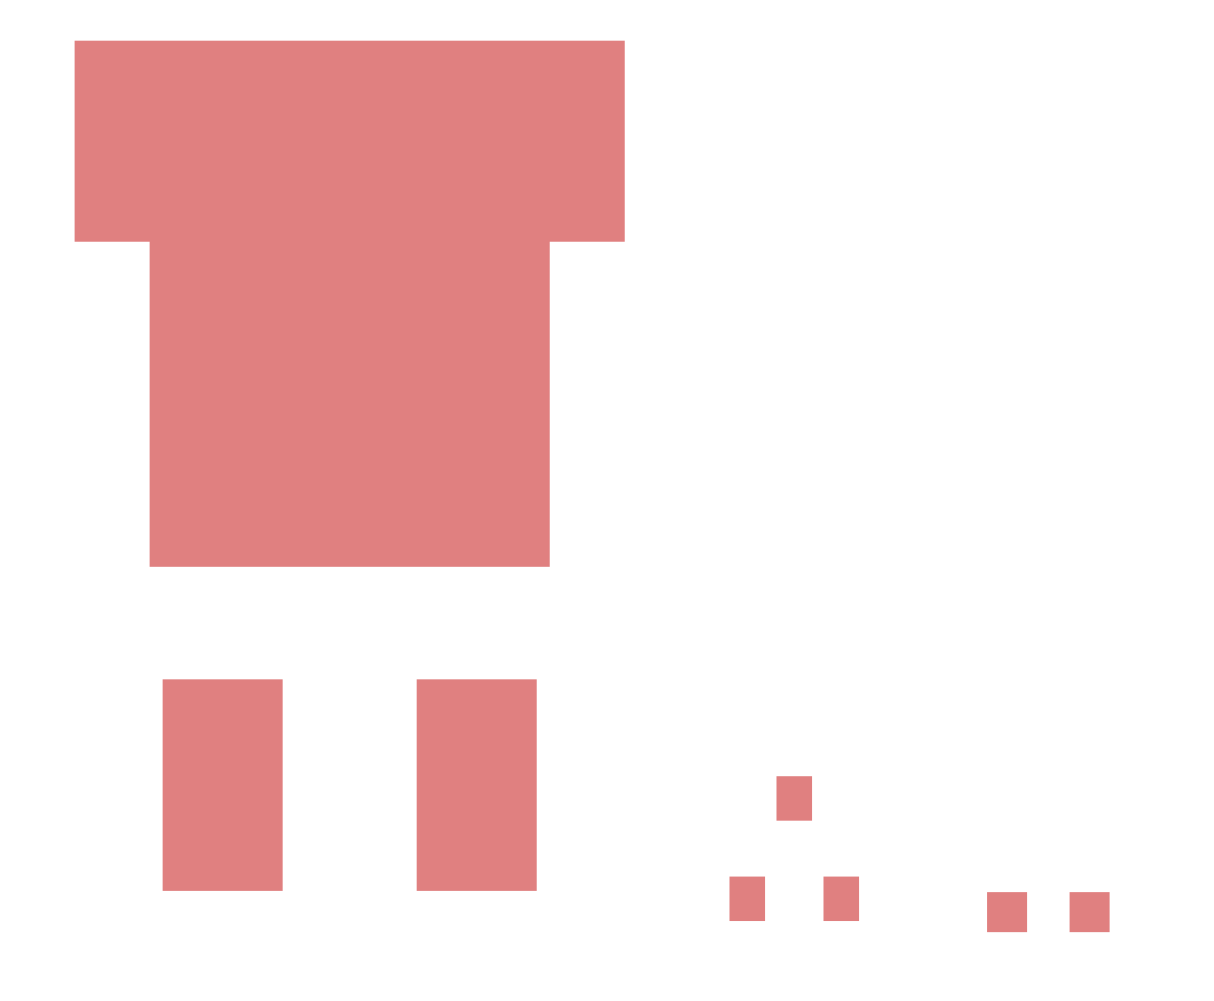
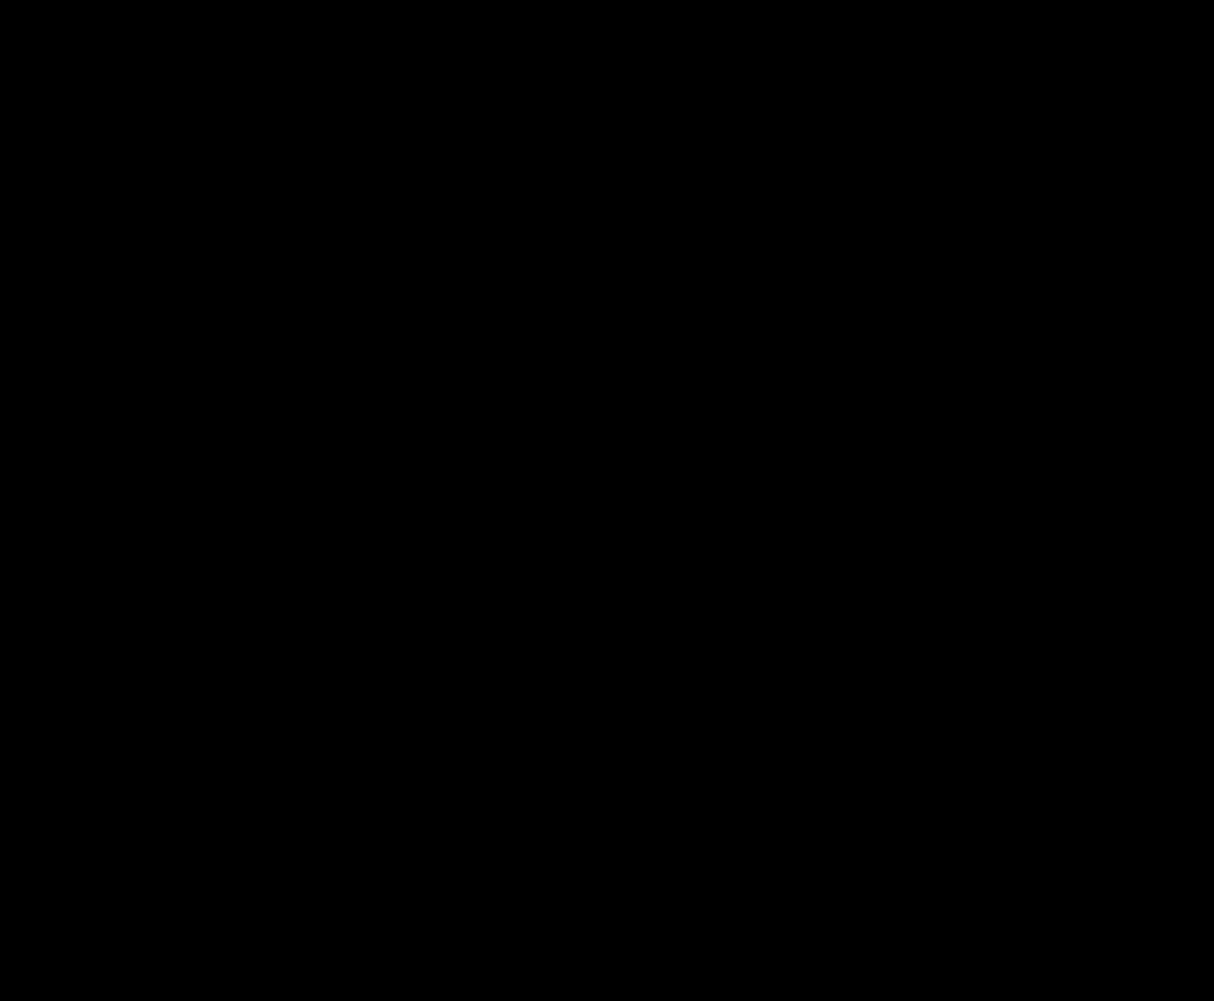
part: (349, 465) -> none
part: (794, 848) -> none
part: (1048, 912) -> none

